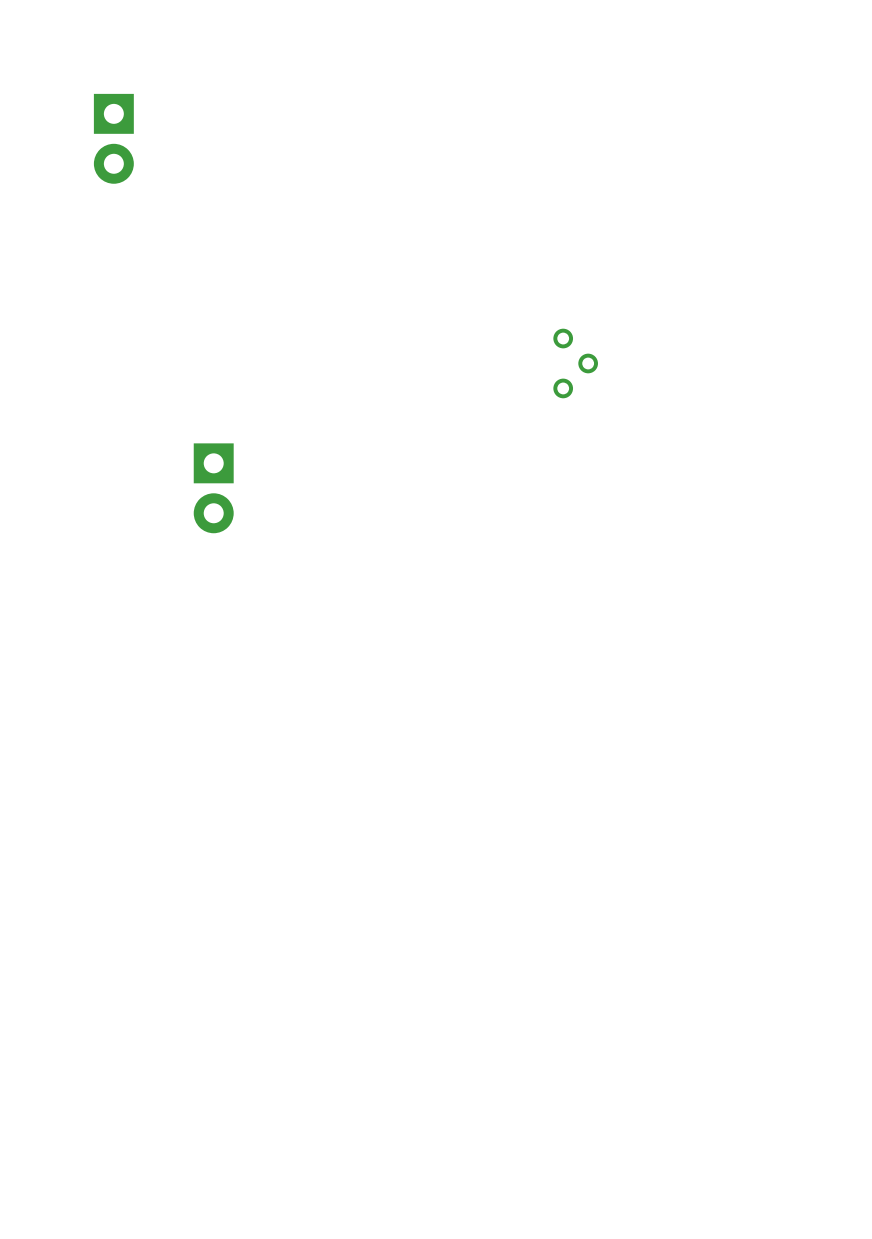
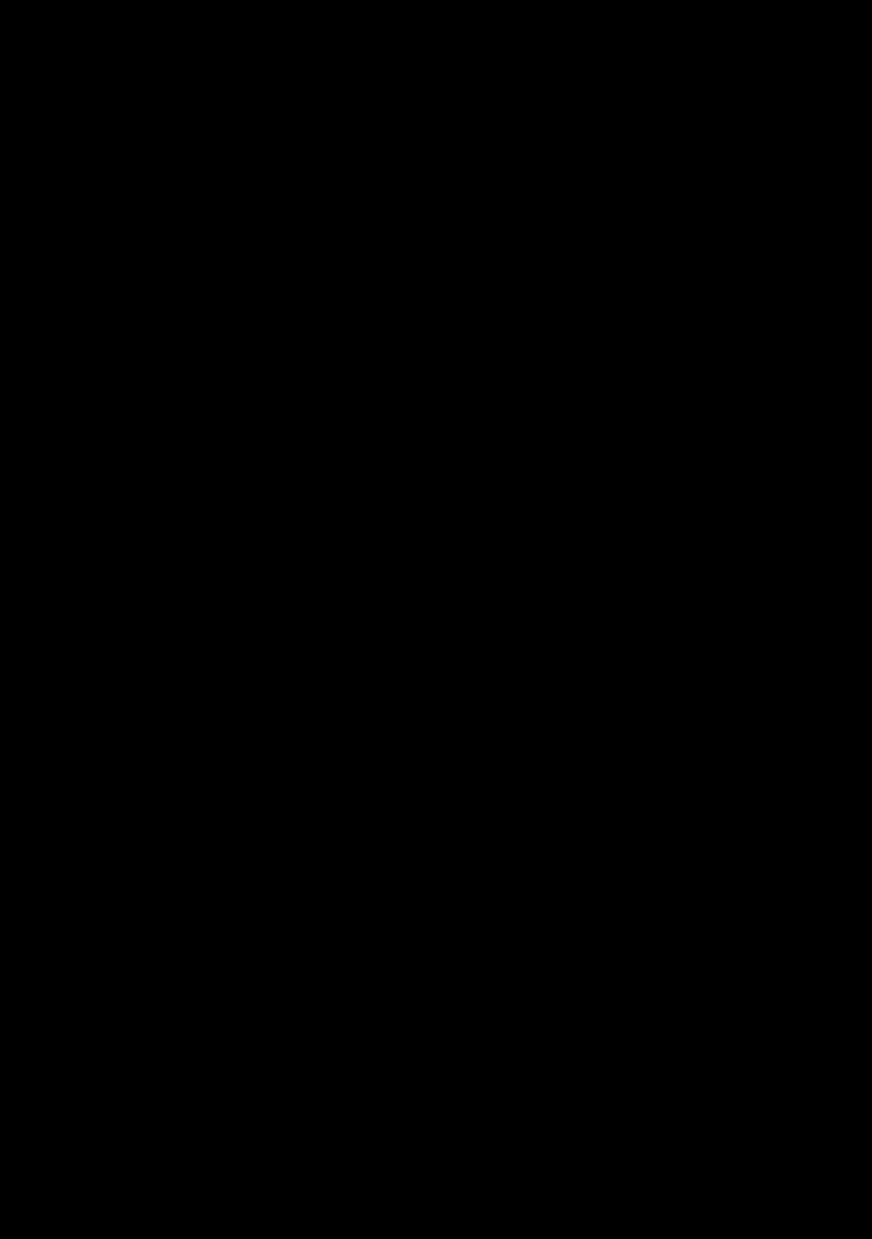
part: (113, 138) -> none
part: (575, 363) -> none
part: (213, 488) -> none

